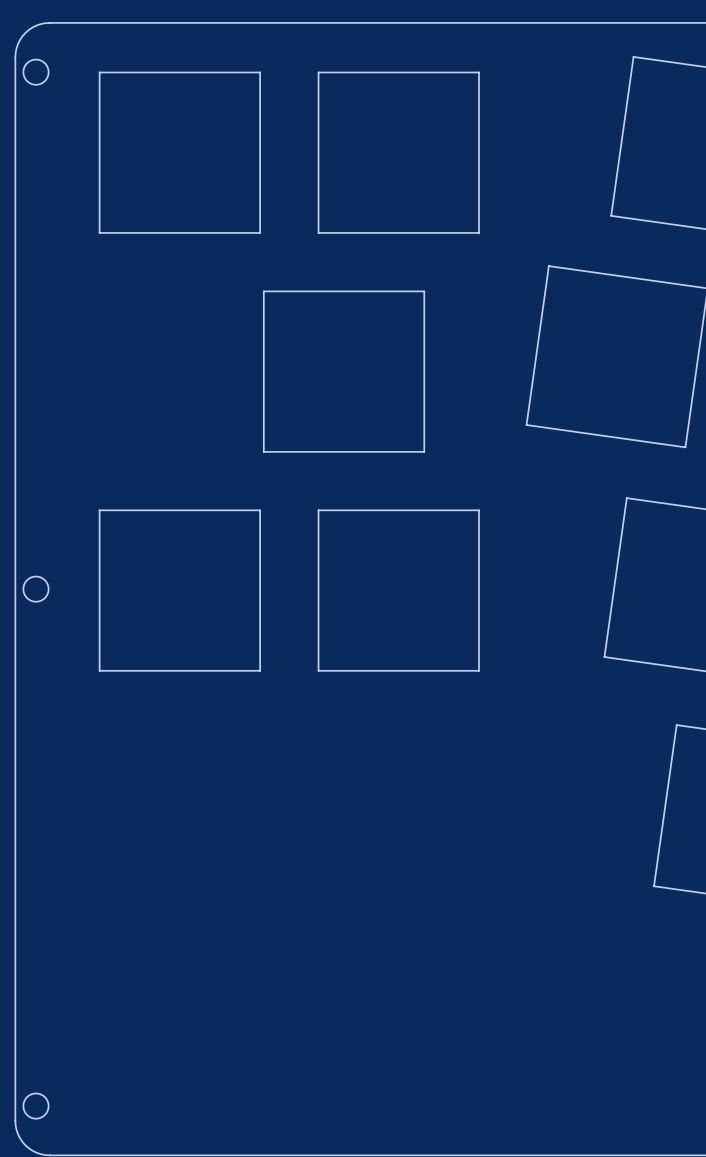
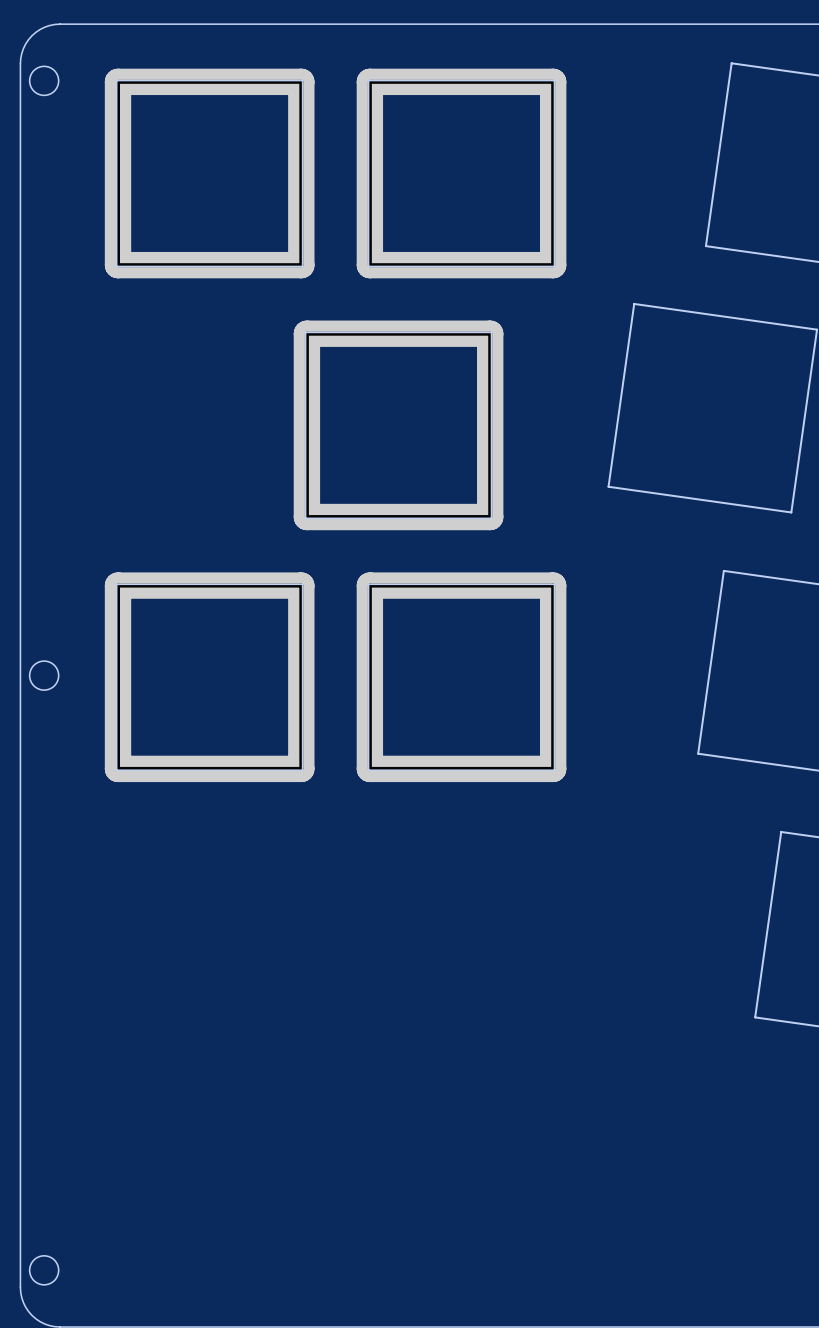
drawing: [98, 71, 261, 234] -> none
drawing: [317, 71, 480, 234] -> none
part: none -> (209, 173)
part: none -> (461, 173)
drawing: [262, 290, 426, 453] -> none
part: none -> (398, 425)
drawing: [98, 509, 261, 672] -> none
drawing: [317, 509, 480, 672] -> none
part: none -> (209, 677)
part: none -> (461, 677)

